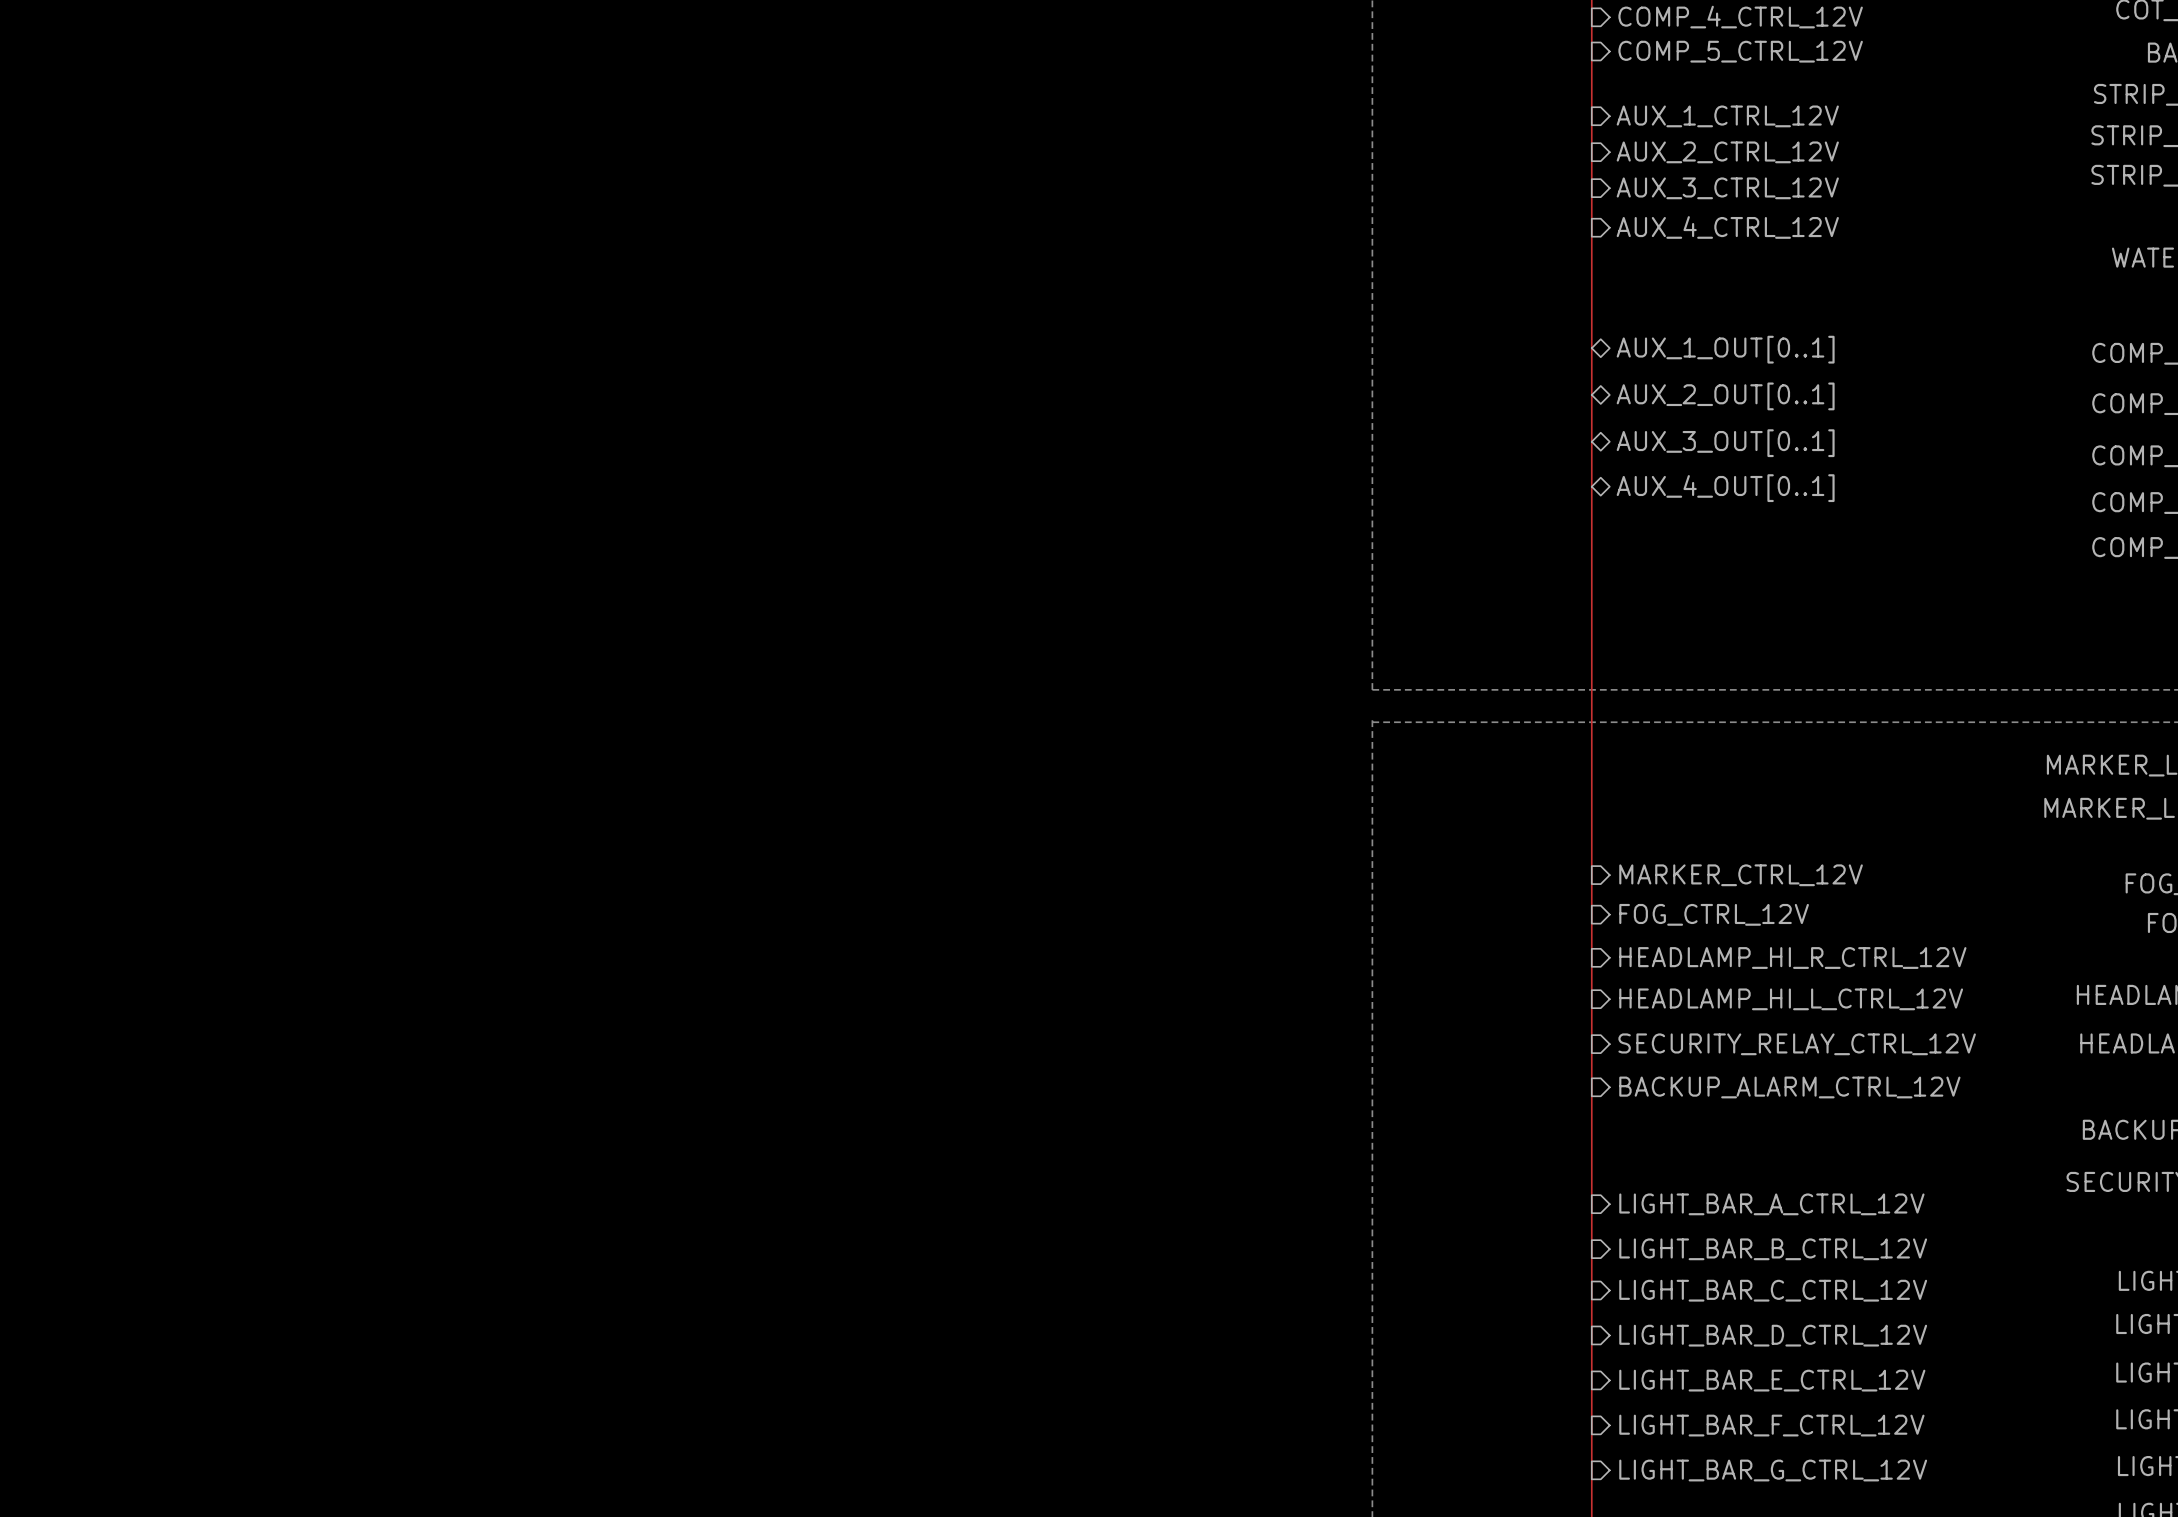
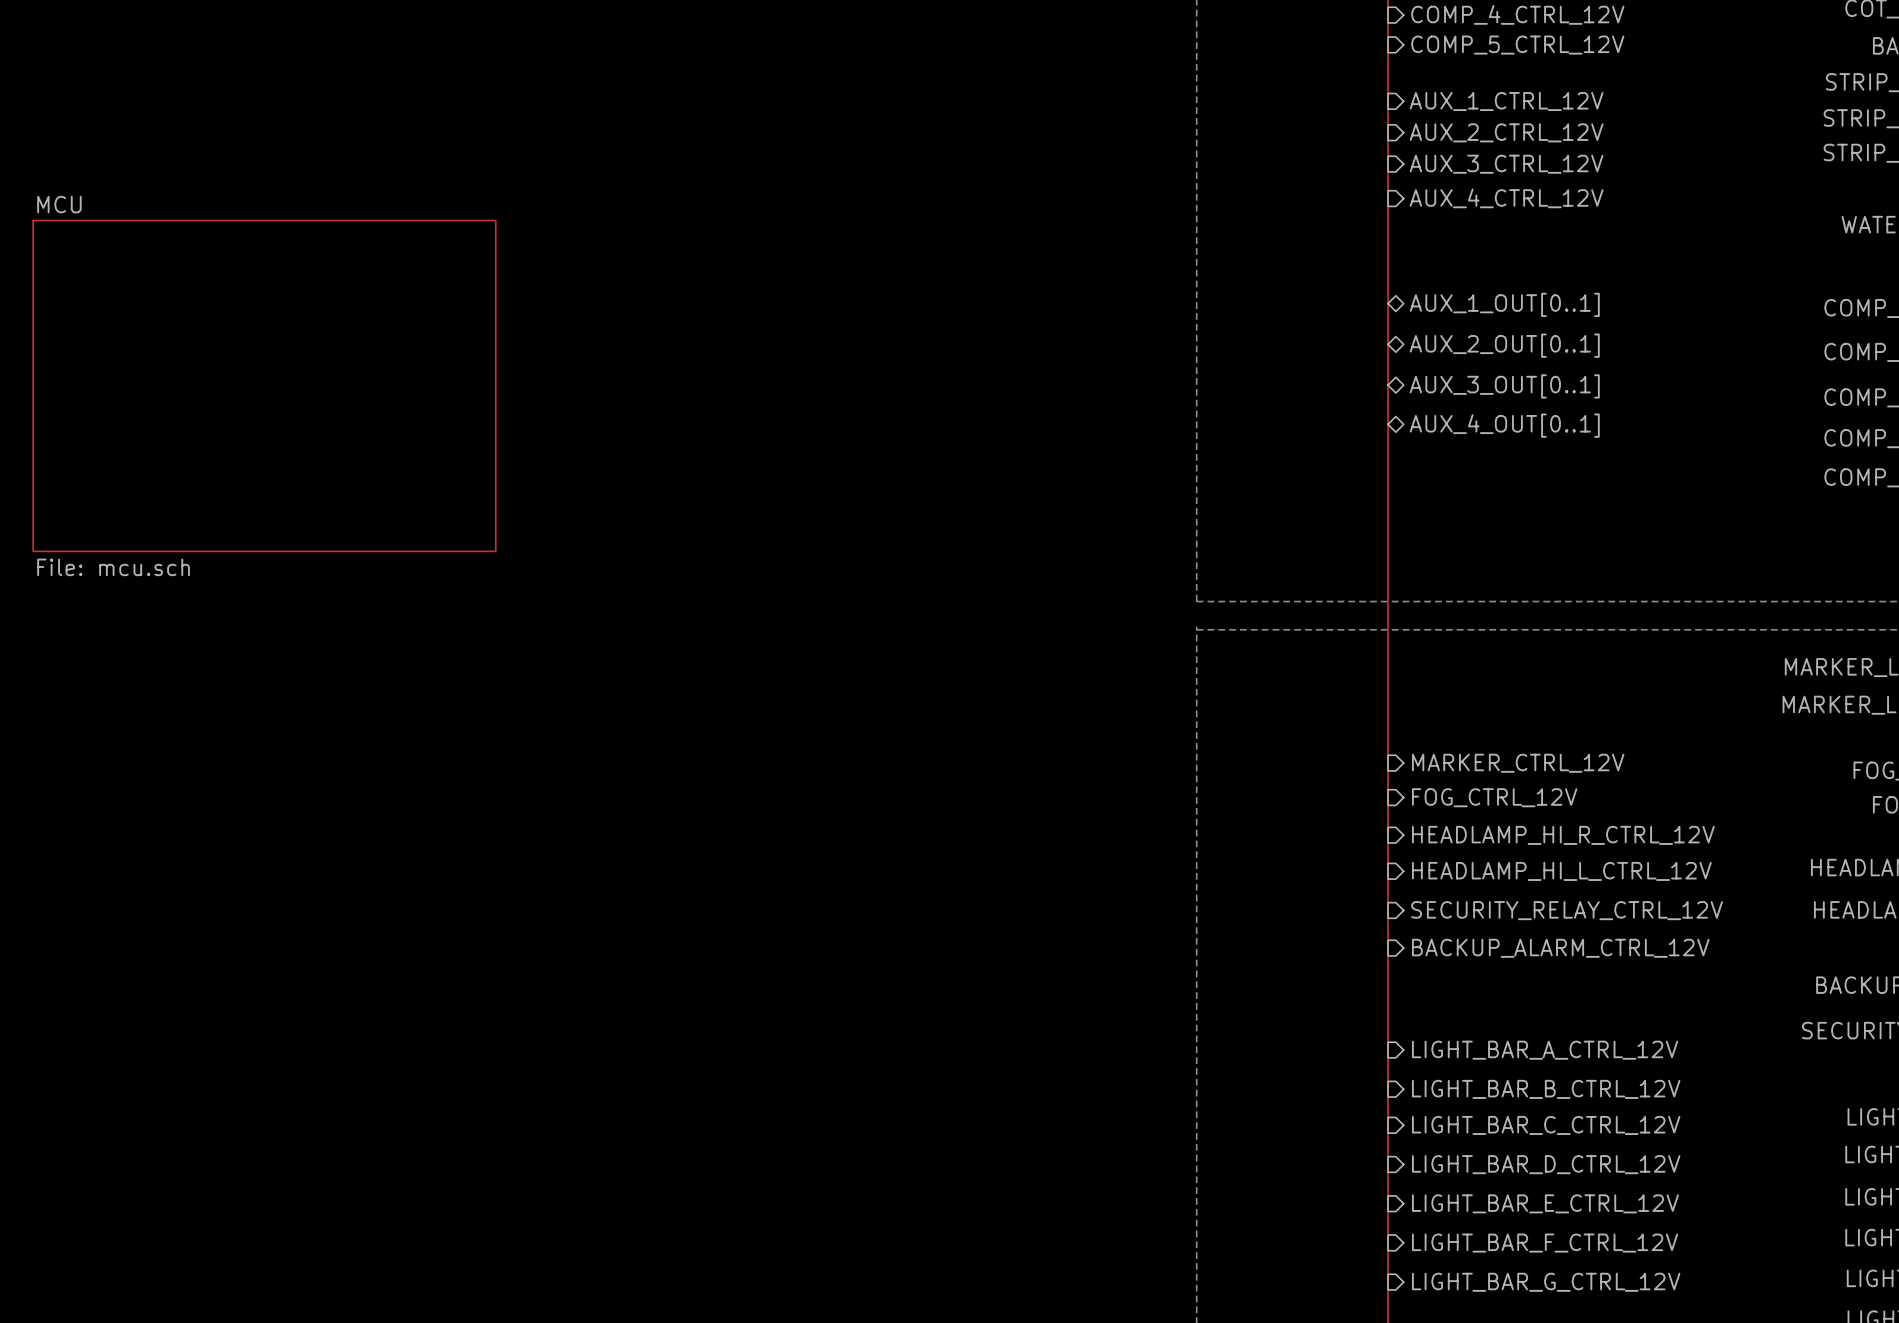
sheet MCU: none -> File: mcu.sch (264, 385)

